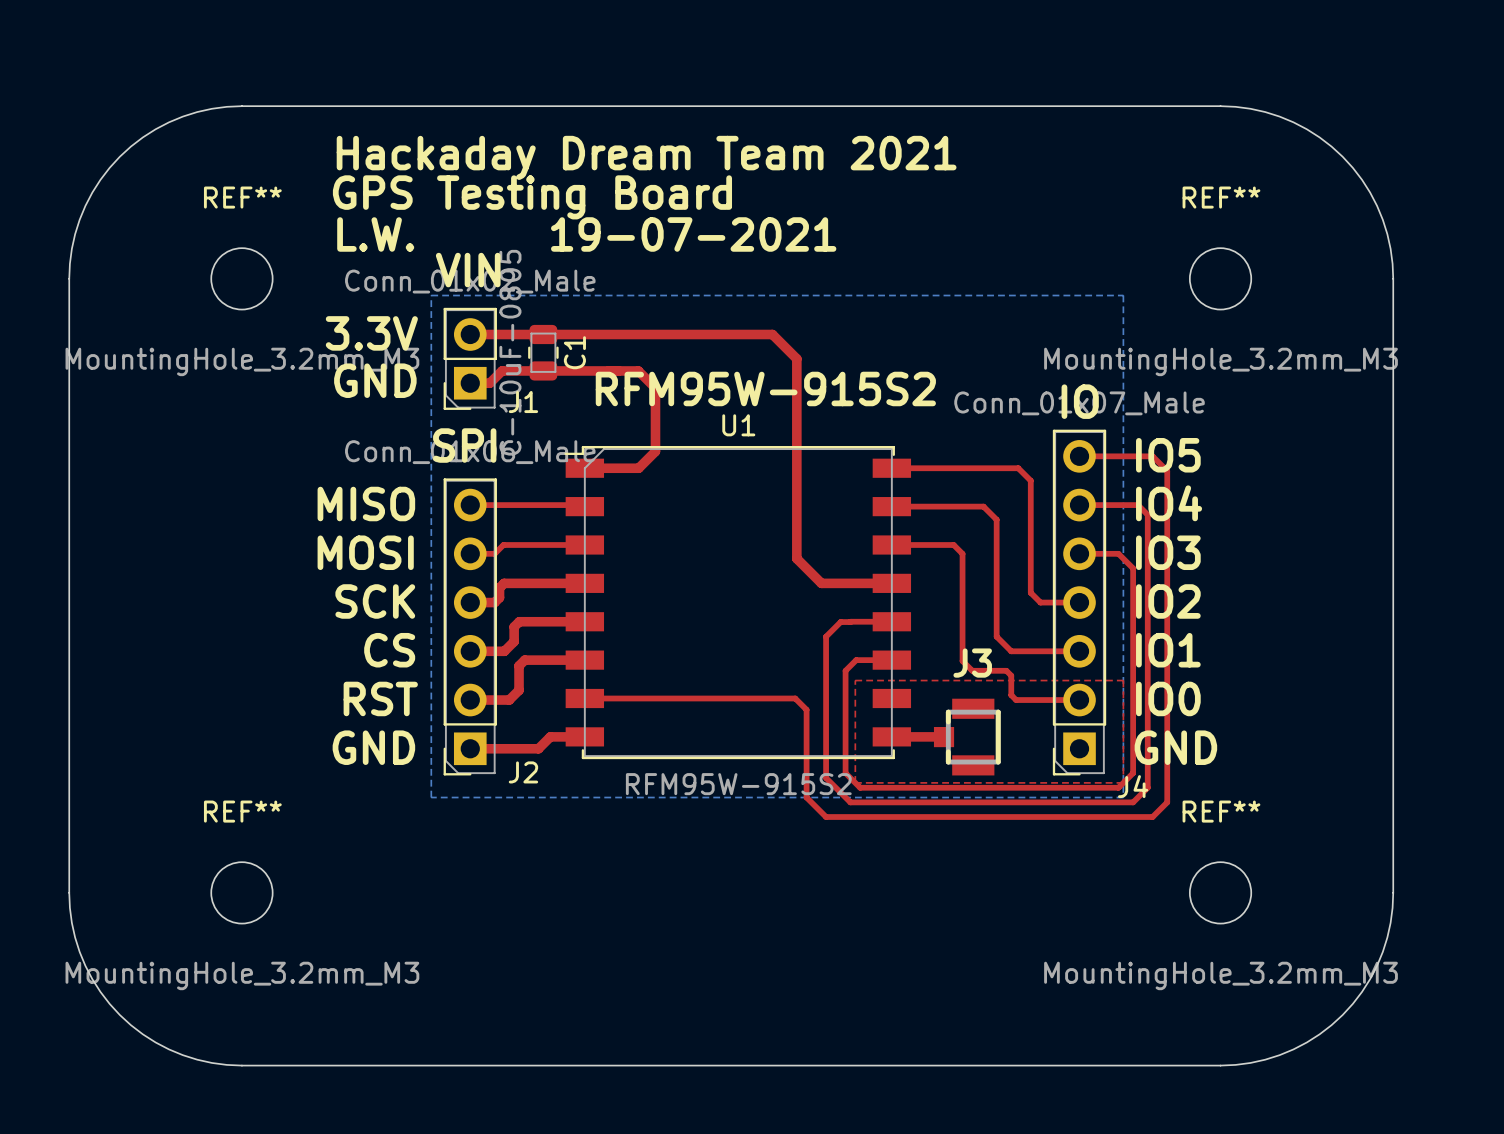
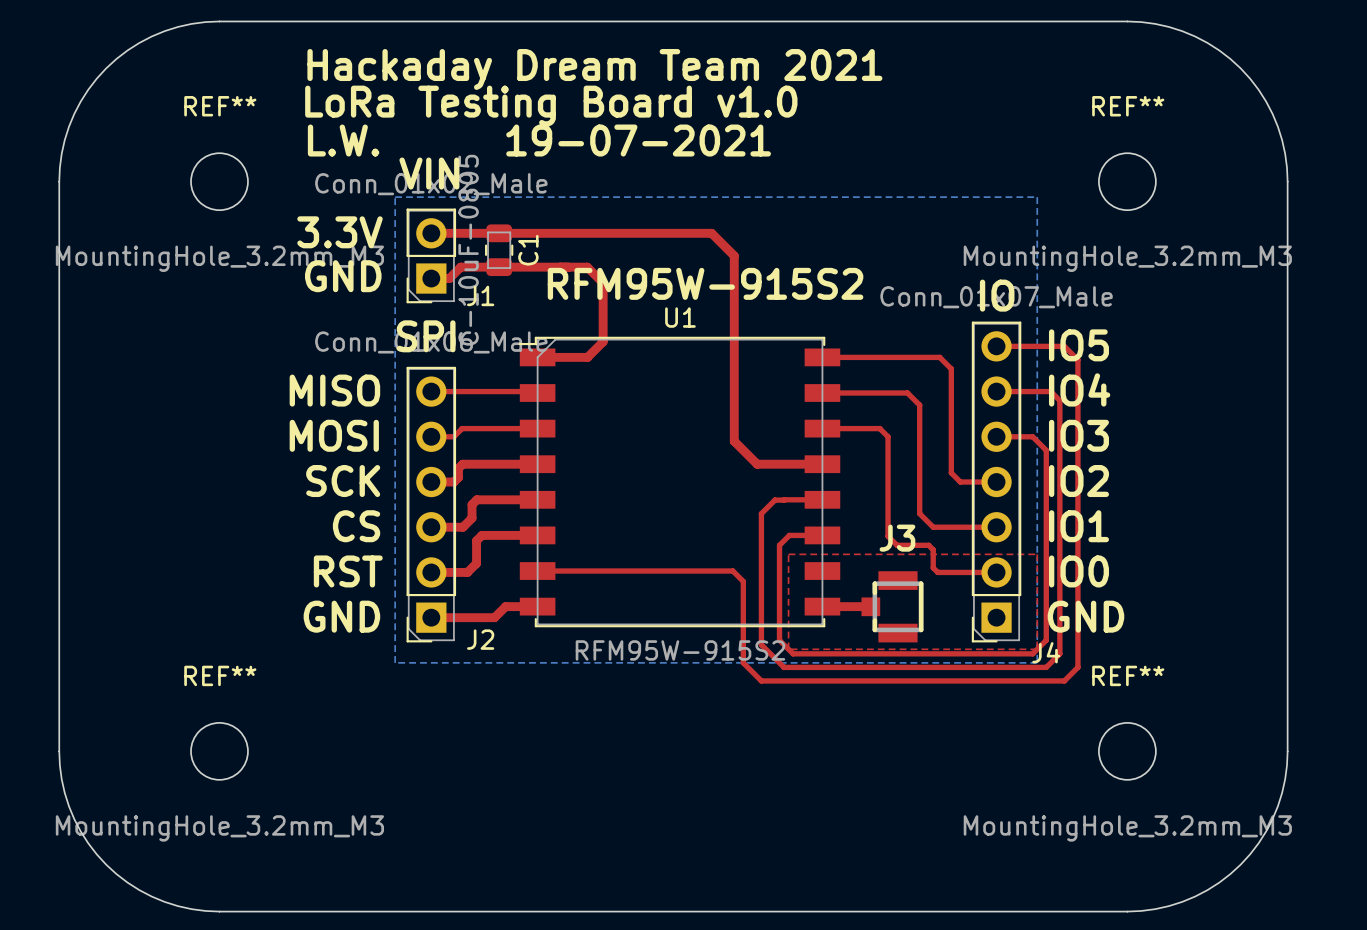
text: GPS Testing Board (532, 197) -> LoRa Testing Board v1.0 (551, 106)

